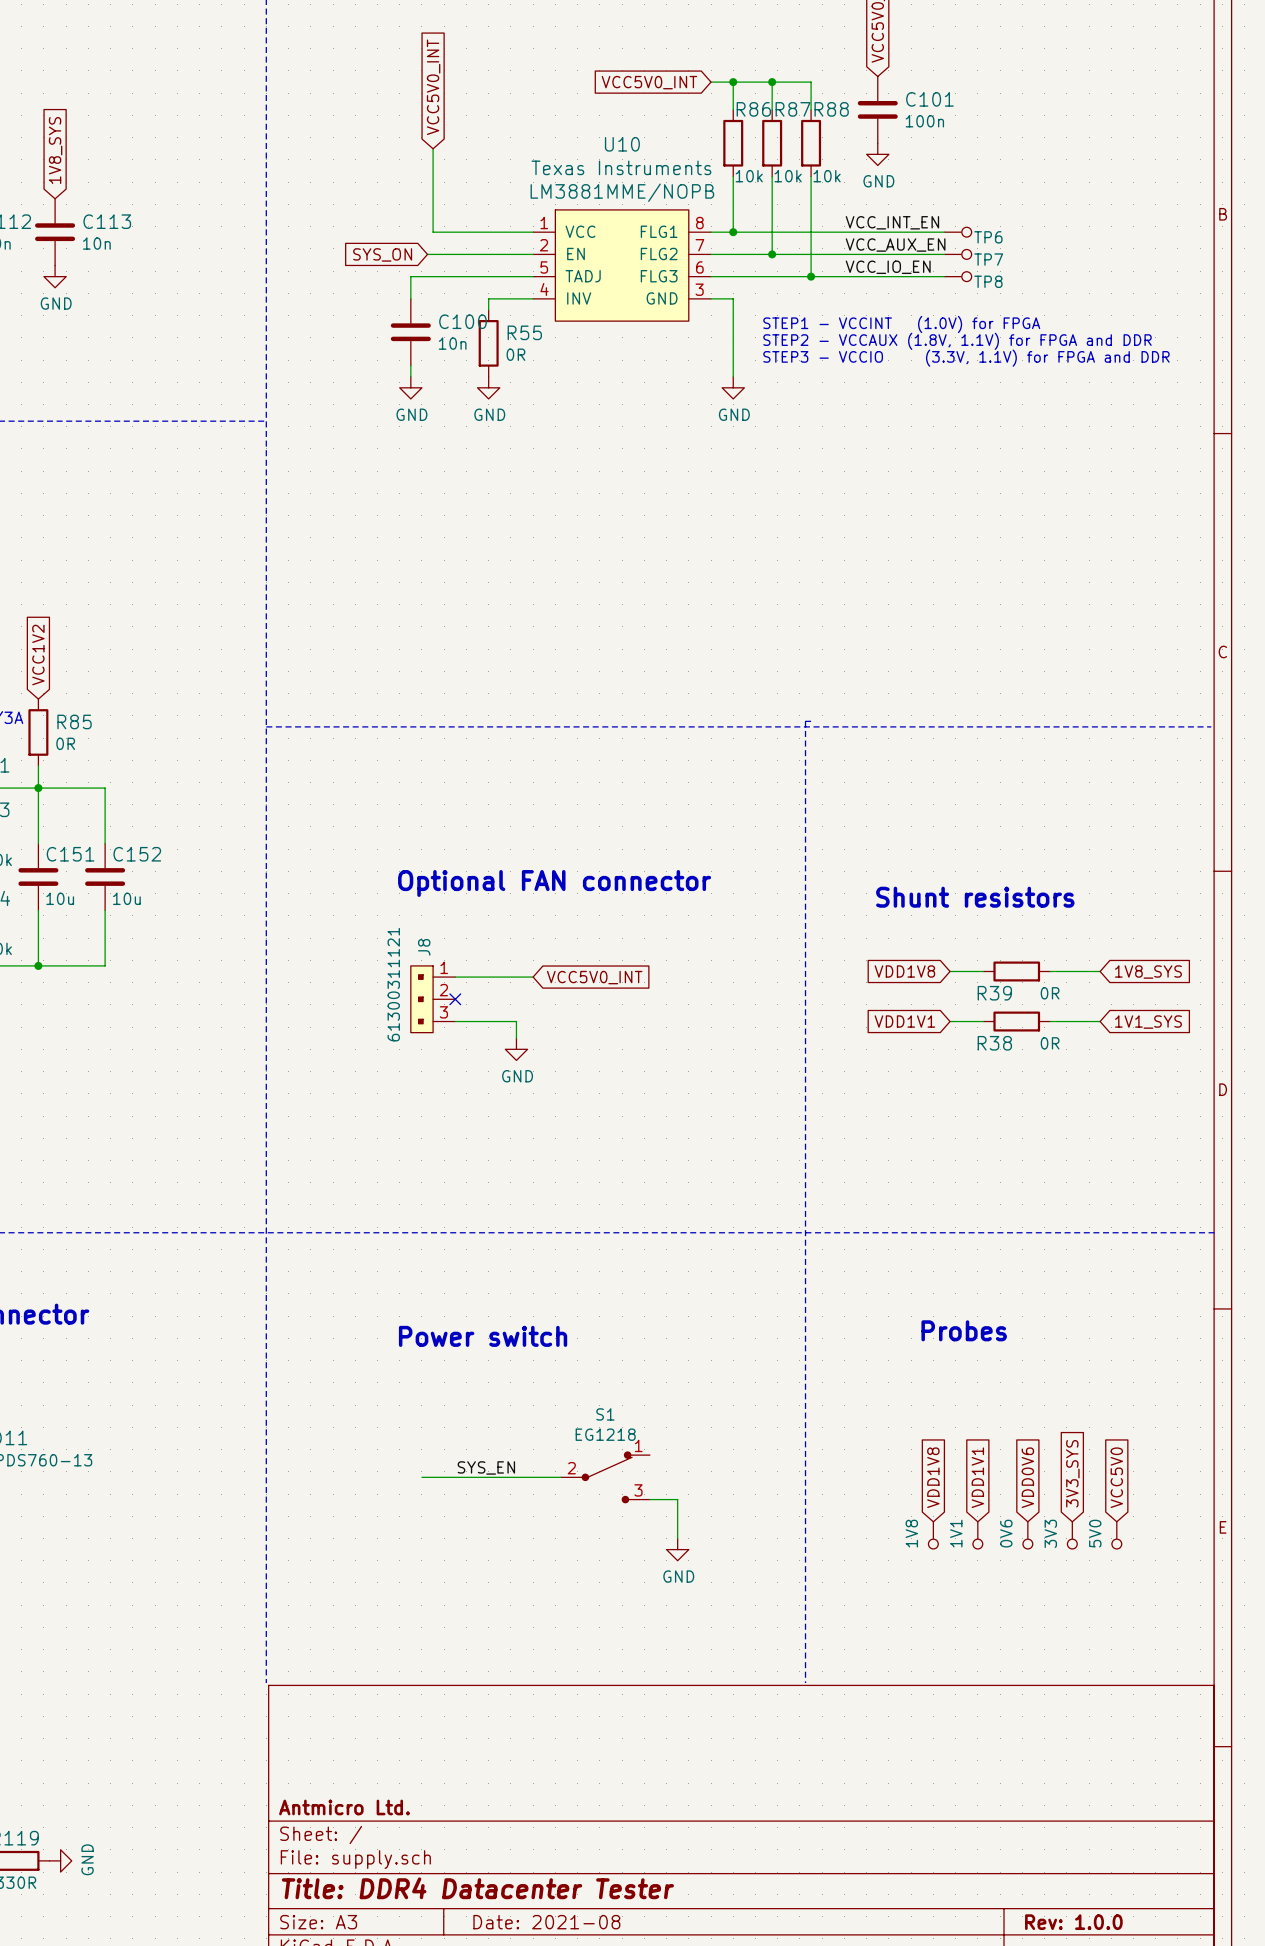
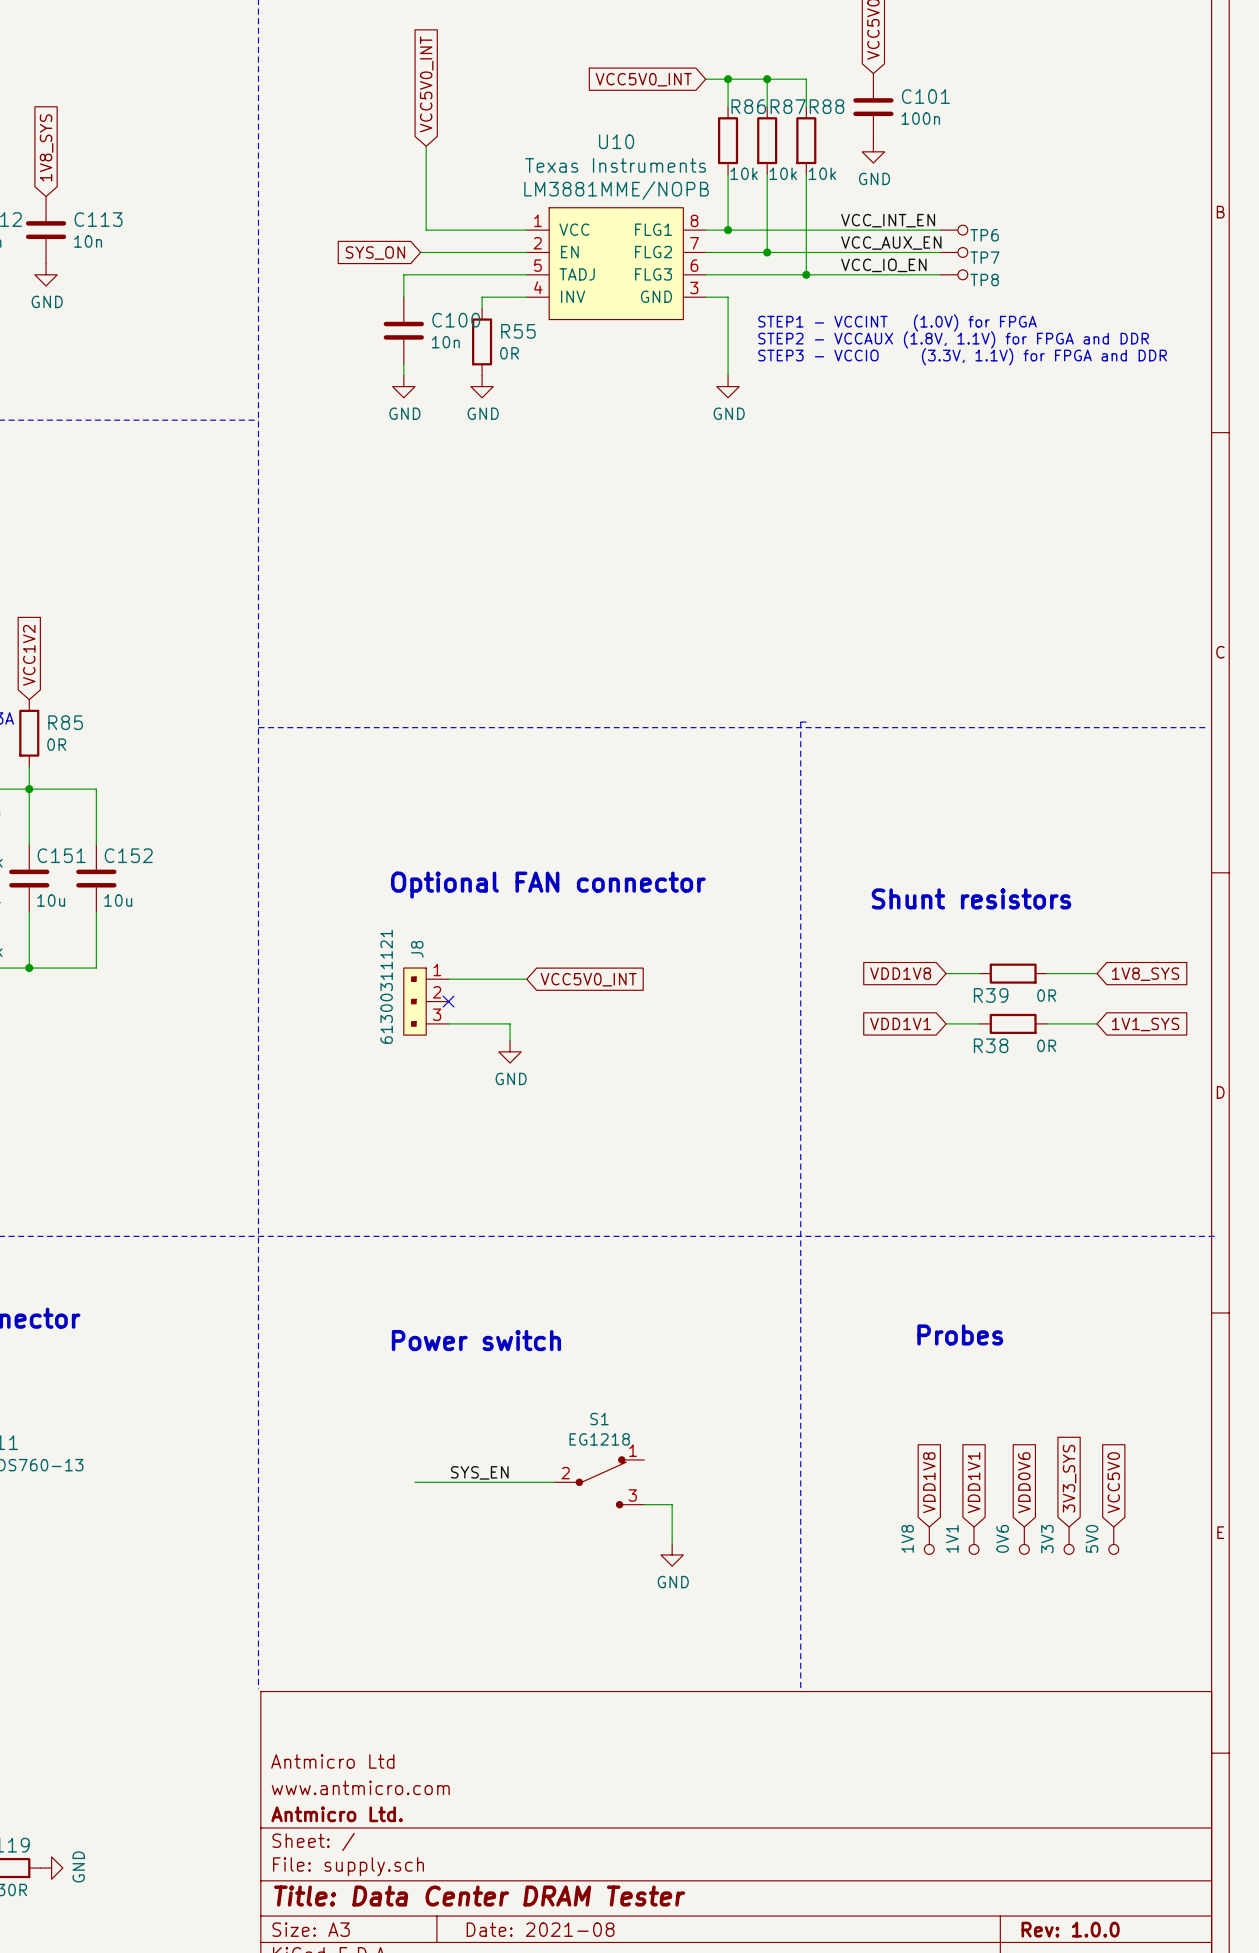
title block: none -> Antmicro Ltd (332, 1761)
title block: none -> www.antmicro.com (360, 1787)
title block: Title: DDR4 Datacenter Tester (477, 1888) -> Title: Data Center DRAM Tester (479, 1896)

